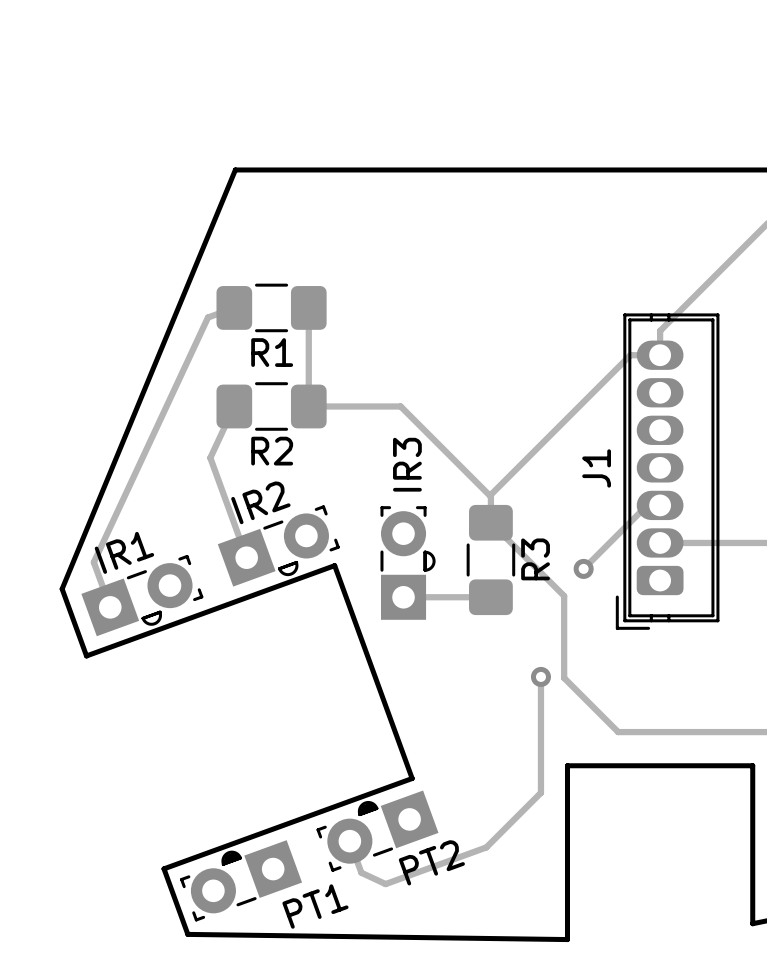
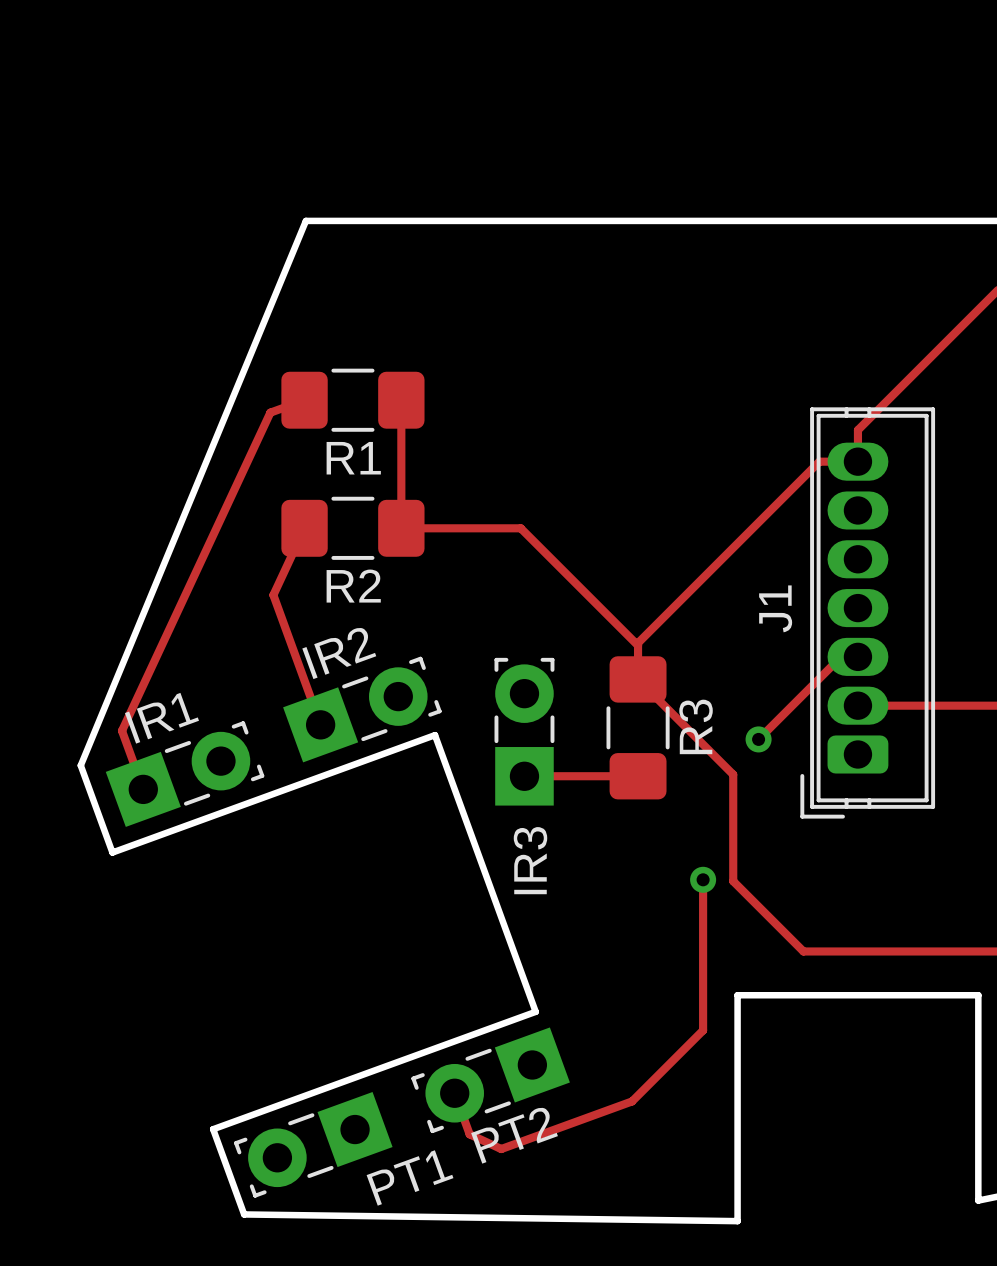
IR3 name position: IR3 (407, 464) -> IR3 (530, 860)
IR2 footprint: [217, 505, 340, 587] -> [283, 656, 442, 763]
IR3 footprint: [380, 506, 436, 620] -> [494, 657, 555, 806]
IR1 footprint: [81, 554, 204, 637] -> [105, 721, 265, 827]
PT2 footprint: [316, 790, 439, 872] -> [411, 1027, 570, 1134]
PT1 footprint: [180, 840, 303, 922] -> [234, 1092, 393, 1198]
PT2 name position: PT2 (431, 862) -> PT2 (514, 1135)

